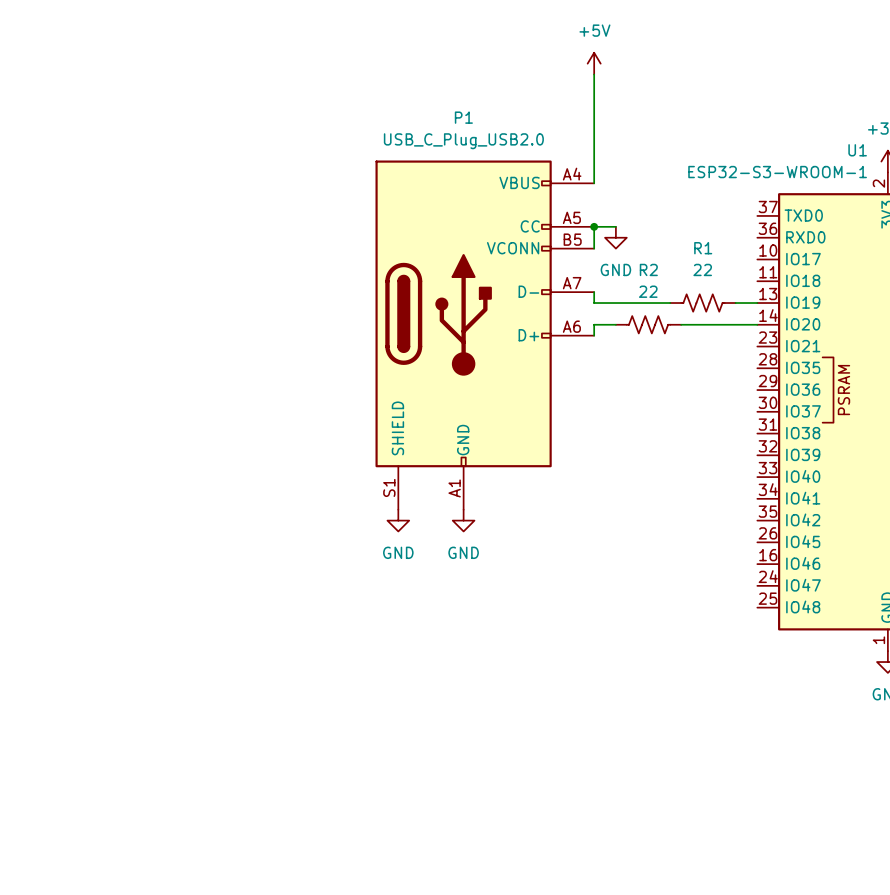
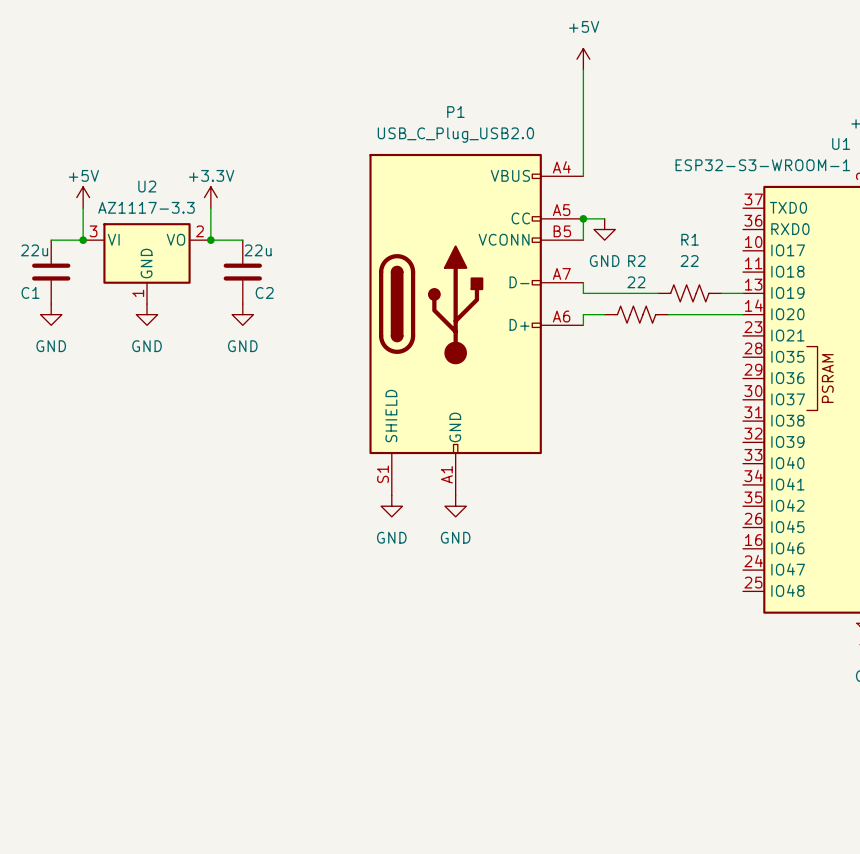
power symbol: none -> +5V (83, 197)
power symbol: none -> +3.3V (210, 197)
wire: none -> (83, 208) (83, 240) (51, 240)
wire: none -> (210, 208) (210, 240) (242, 240)
junction: none -> (83, 240)
junction: none -> (210, 240)
U2: none -> AZ1117-3.3 (147, 263)
C1: none -> 22u (51, 272)
C2: none -> 22u (242, 272)
power symbol: none -> GND (51, 314)
power symbol: none -> GND (147, 314)
power symbol: none -> GND (242, 314)

